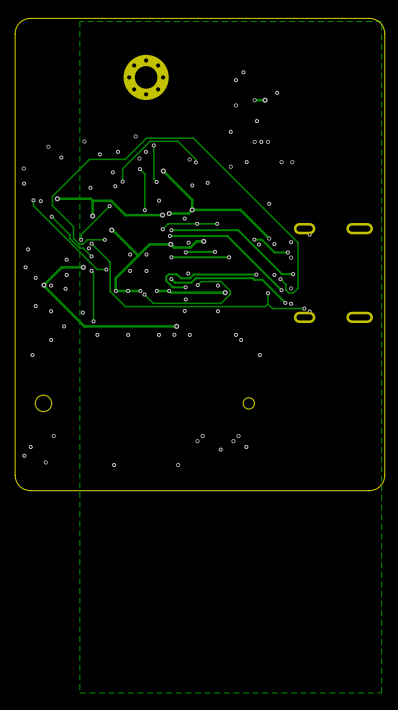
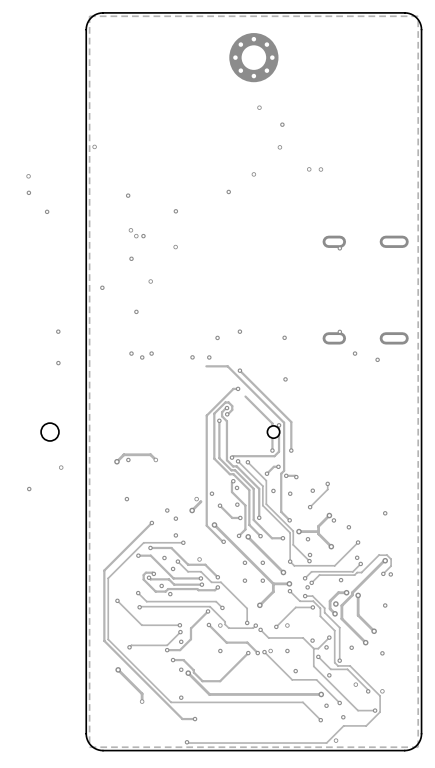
board edge: (92, 18) (28, 18) (19, 22) (15, 31) (15, 475) (17, 482) (22, 488) (30, 490) (369, 490) (380, 486) (384, 475) -> (103, 12) (91, 17) (86, 29) (86, 733) (89, 744) (94, 748) (103, 750) (404, 750) (414, 747) (419, 742) (421, 733) (421, 510)
via: (243, 72) -> none
part position: (146, 77) -> (253, 57)
via: (235, 80) -> none
via: (277, 92) -> none
via: (254, 100) -> none
track: (265, 100) (254, 100) -> none
via: (265, 100) -> none
via: (230, 131) -> none
via: (135, 136) -> none
via: (261, 141) -> none
via: (267, 141) -> none
track: (153, 145) (153, 179) (156, 182) -> none
via: (153, 145) -> none
via: (48, 146) -> none
via: (118, 151) -> none
via: (145, 151) -> none
via: (99, 154) -> none
via: (61, 157) -> none
via: (139, 158) -> none
via: (189, 159) -> none
track: (195, 162) (195, 159) (177, 141) (150, 141) (122, 168) (122, 181) -> none
via: (195, 162) -> none
via: (246, 162) -> none
track: (139, 169) (144, 174) (144, 210) -> none
via: (139, 169) -> none
track: (163, 171) (192, 199) (192, 209) -> none
via: (163, 171) -> none
via: (112, 172) -> none
via: (122, 181) -> none
via: (156, 182) -> none
via: (192, 185) -> none
via: (90, 187) -> none
track: (57, 198) (90, 198) (92, 200) -> none
via: (57, 198) -> none
track: (33, 200) (33, 205) (97, 269) (106, 269) -> none
via: (33, 200) -> none
track: (92, 200) (92, 216) -> none
track: (92, 200) (111, 200) (125, 215) (162, 215) -> none
via: (269, 203) -> none
track: (109, 206) (81, 234) (81, 239) -> none
via: (109, 206) -> none
track: (192, 209) (240, 209) (269, 238) -> none
track: (192, 209) (188, 213) (169, 213) -> none
via: (192, 209) -> none
via: (144, 210) -> none
via: (169, 213) -> none
via: (162, 215) -> none
track: (51, 216) (70, 234) (70, 238) (79, 248) (83, 248) (91, 256) -> none
via: (51, 216) -> none
via: (92, 216) -> none
via: none -> (130, 230)
via: (184, 218) -> none
via: none -> (136, 236)
via: none -> (143, 236)
via: (197, 223) -> none
track: (217, 223) (168, 223) (162, 229) -> none
via: (217, 223) -> none
via: (162, 229) -> none
track: (111, 230) (138, 255) -> none
via: (111, 230) -> none
track: (171, 230) (238, 230) (282, 274) (293, 274) -> none
via: (171, 230) -> none
via: none -> (175, 247)
track: (169, 236) (227, 236) (281, 290) -> none
via: (169, 236) -> none
via: (269, 238) -> none
via: (81, 239) -> none
track: (104, 239) (87, 239) (83, 243) (78, 243) (73, 238) (73, 226) (52, 205) (52, 196) (89, 159) (125, 159) (146, 138) (193, 138) (298, 242) (298, 288) (293, 292) (288, 292) (285, 290) (285, 284) (280, 279) -> none
via: (104, 239) -> none
track: (254, 239) (261, 239) (274, 252) (287, 252) -> none
via: (254, 239) -> none
track: (203, 241) (196, 241) (190, 247) (174, 247) (170, 244) (149, 244) (115, 278) (115, 290) (140, 290) -> none
via: (203, 241) -> none
via: (188, 242) -> none
via: (291, 242) -> none
track: (91, 243) (110, 262) (110, 291) (125, 306) (265, 306) (267, 304) -> none
via: (91, 243) -> none
via: none -> (131, 258)
via: (170, 244) -> none
via: (258, 244) -> none
via: (274, 244) -> none
via: (88, 248) -> none
via: (28, 249) -> none
track: (215, 251) (185, 252) -> none
via: (215, 251) -> none
via: (185, 252) -> none
via: (287, 252) -> none
via: (130, 254) -> none
via: (146, 254) -> none
via: (91, 256) -> none
via: (171, 257) -> none
track: (229, 257) (171, 257) -> none
via: (229, 257) -> none
via: (291, 257) -> none
via: (66, 259) -> none
via: none -> (150, 281)
via: (25, 267) -> none
track: (83, 267) (61, 267) (43, 285) (84, 326) (176, 326) -> none
via: (83, 267) -> none
via: (106, 269) -> none
track: (91, 270) (93, 272) (93, 321) -> none
via: (130, 270) -> none
via: (146, 270) -> none
via: (188, 273) -> none
track: (256, 274) (193, 274) (190, 278) (180, 278) (176, 274) (168, 274) (166, 276) (166, 280) (172, 287) (185, 287) -> none
via: (256, 274) -> none
via: (274, 274) -> none
via: (293, 274) -> none
via: (66, 275) -> none
via: (35, 277) -> none
track: (171, 279) (174, 282) (191, 282) (195, 278) (262, 279) (285, 302) -> none
via: (171, 279) -> none
via: (280, 279) -> none
via: (43, 285) -> none
via: (51, 285) -> none
track: (197, 285) (201, 281) (220, 281) (230, 290) (230, 294) (221, 303) (153, 303) (144, 294) -> none
via: (197, 285) -> none
via: (217, 285) -> none
via: (185, 287) -> none
via: (65, 288) -> none
via: (291, 288) -> none
via: (115, 290) -> none
via: (128, 290) -> none
via: (140, 290) -> none
track: (156, 290) (225, 292) -> none
via: (156, 290) -> none
via: (169, 290) -> none
via: (281, 290) -> none
via: (225, 292) -> none
via: none -> (136, 311)
track: (267, 293) (267, 304) -> none
via: (267, 293) -> none
via: (144, 294) -> none
via: (185, 299) -> none
via: (285, 302) -> none
via: (291, 303) -> none
track: (267, 304) (272, 308) (304, 308) -> none
via: (35, 306) -> none
via: (304, 308) -> none
via: (184, 311) -> none
via: (82, 312) -> none
via: none -> (217, 337)
via: none -> (284, 337)
via: (93, 321) -> none
via: (64, 326) -> none
via: (176, 326) -> none
via: none -> (131, 353)
via: none -> (151, 353)
via: none -> (355, 353)
via: (97, 334) -> none
via: (158, 334) -> none
via: (235, 334) -> none
via: none -> (377, 359)
via: (241, 340) -> none
track: none -> (206, 366) (227, 366) (284, 422) (284, 470) (281, 473) (281, 511) (289, 520)
track: none -> (239, 370) (291, 422) (291, 450)
via: none -> (239, 370)
via: (32, 355) -> none
track: none -> (238, 388) (233, 388) (206, 415) (206, 525) (223, 541)
via: none -> (238, 388)
track: none -> (245, 396) (272, 423) (272, 450)
track: none -> (227, 408) (222, 412) (222, 416) (226, 421) (226, 460) (233, 466) (236, 466) (259, 488) (259, 517)
via: none -> (227, 408)
track: none -> (227, 414) (232, 409) (232, 406) (228, 402) (225, 402) (214, 413) (214, 458) (249, 490) (249, 524) (260, 536)
via: none -> (227, 414)
track: none -> (219, 420) (219, 458) (253, 488) (253, 519) (272, 538) (282, 538)
via: none -> (219, 420)
track: none -> (279, 425) (279, 451) (274, 456) (232, 457)
via: none -> (279, 425)
via: none -> (272, 450)
via: none -> (291, 450)
via: none -> (232, 457)
via: none -> (128, 459)
track: none -> (155, 459) (150, 454) (123, 454) (116, 461)
via: none -> (155, 459)
via: none -> (116, 461)
track: none -> (238, 461) (262, 486) (262, 505) (290, 532) (290, 561) (294, 565) (334, 565) (358, 542)
via: none -> (238, 461)
track: none -> (247, 462) (266, 480) (266, 504) (293, 531) (293, 544) (309, 561)
via: none -> (247, 462)
track: none -> (278, 466) (273, 466) (266, 473)
via: none -> (278, 466)
via: (202, 436) -> none
via: (238, 436) -> none
via: (197, 441) -> none
via: (233, 441) -> none
via: none -> (266, 473)
track: none -> (286, 475) (296, 477)
via: none -> (286, 475)
via: none -> (296, 477)
via: (30, 447) -> none
via: (246, 447) -> none
track: none -> (233, 481) (231, 492) (245, 505) (245, 529) (239, 535)
via: none -> (233, 481)
via: (220, 449) -> none
track: none -> (327, 483) (327, 489) (310, 507)
via: none -> (327, 483)
via: none -> (237, 487)
via: none -> (273, 490)
via: none -> (312, 490)
via: none -> (211, 493)
via: none -> (290, 493)
via: (45, 462) -> none
track: none -> (200, 501) (192, 510)
via: none -> (237, 504)
track: none -> (220, 505) (232, 517) (240, 517)
via: none -> (220, 505)
via: none -> (310, 507)
via: none -> (167, 510)
via: none -> (192, 510)
via: none -> (385, 513)
track: none -> (329, 515) (318, 526) (318, 533) (331, 546)
via: none -> (329, 515)
via: none -> (175, 518)
via: none -> (240, 517)
via: none -> (259, 517)
via: none -> (289, 520)
via: none -> (333, 520)
track: none -> (151, 522) (104, 570) (104, 640) (182, 719) (195, 719)
via: none -> (151, 522)
track: none -> (214, 524) (273, 583)
via: none -> (214, 524)
via: none -> (348, 527)
via: none -> (299, 531)
track: none -> (318, 531) (299, 531)
via: none -> (175, 535)
via: none -> (239, 535)
track: none -> (248, 536) (283, 572)
via: none -> (248, 536)
via: none -> (260, 536)
via: none -> (282, 538)
via: none -> (307, 539)
via: none -> (223, 541)
via: none -> (358, 542)
track: none -> (183, 542) (143, 542) (108, 578) (108, 639) (171, 702) (303, 702) (320, 720)
via: none -> (183, 542)
via: none -> (331, 546)
track: none -> (150, 547) (171, 547) (188, 564) (205, 564) (217, 577)
via: none -> (150, 547)
track: none -> (138, 555) (150, 555) (173, 578) (200, 578)
via: none -> (138, 555)
via: none -> (309, 554)
via: none -> (357, 557)
via: none -> (164, 558)
via: none -> (199, 559)
via: none -> (309, 561)
track: none -> (385, 560) (341, 605) (341, 618) (365, 642)
via: none -> (385, 560)
track: none -> (177, 561) (188, 571) (200, 571) (211, 582) (220, 582) (247, 608) (247, 622)
via: none -> (177, 561)
via: none -> (290, 561)
via: none -> (244, 562)
via: none -> (262, 562)
track: none -> (360, 563) (352, 571) (311, 571) (305, 578)
via: none -> (360, 563)
via: none -> (173, 568)
via: none -> (283, 572)
track: none -> (153, 573) (145, 572) (143, 579) (155, 591) (165, 591) (168, 589) (215, 590) (217, 587)
via: none -> (153, 573)
track: none -> (383, 573) (391, 566) (391, 559) (387, 555) (378, 555) (361, 572) (357, 572) (354, 575) (319, 575) (311, 582)
via: none -> (383, 573)
via: none -> (390, 574)
via: none -> (217, 577)
track: none -> (149, 577) (168, 579) (174, 584) (201, 584)
via: none -> (149, 577)
via: none -> (200, 578)
via: none -> (305, 578)
via: none -> (244, 580)
via: none -> (262, 580)
via: none -> (341, 580)
via: none -> (311, 582)
track: none -> (273, 583) (273, 591) (259, 605)
track: none -> (289, 583) (273, 583)
via: none -> (289, 583)
via: none -> (201, 584)
via: none -> (161, 585)
via: none -> (217, 587)
via: none -> (307, 587)
track: none -> (289, 591) (300, 601) (313, 601) (320, 608) (320, 616) (334, 630) (334, 662) (338, 665) (350, 665) (380, 695) (380, 712) (366, 725) (343, 725) (326, 743) (187, 742)
via: none -> (289, 591)
track: none -> (138, 593) (146, 601) (216, 601) (222, 607)
via: none -> (138, 593)
track: none -> (346, 592) (338, 592) (330, 601) (330, 608) (335, 613)
via: none -> (346, 592)
via: none -> (170, 594)
track: none -> (358, 595) (358, 615) (374, 631)
via: none -> (358, 595)
track: none -> (305, 596) (312, 596) (324, 608) (324, 612) (339, 627) (339, 660)
via: none -> (305, 596)
track: none -> (117, 600) (141, 625) (179, 625)
via: none -> (117, 600)
via: none -> (335, 604)
via: none -> (259, 605)
via: none -> (385, 605)
track: none -> (139, 607) (210, 606) (228, 628) (253, 628) (255, 625)
via: none -> (139, 607)
via: none -> (222, 607)
track: none -> (312, 607) (295, 607) (276, 626)
via: none -> (312, 607)
track: none -> (208, 611) (190, 628) (190, 639) (180, 650) (167, 650)
via: none -> (208, 611)
via: none -> (335, 613)
via: none -> (247, 622)
via: none -> (179, 625)
track: none -> (208, 624) (226, 642) (247, 642) (257, 653)
via: none -> (208, 624)
via: none -> (220, 625)
via: none -> (255, 625)
via: none -> (287, 625)
via: none -> (276, 626)
track: none -> (260, 629) (268, 637) (303, 637) (313, 648)
via: none -> (260, 629)
via: none -> (374, 631)
track: none -> (180, 632) (167, 645) (131, 645) (129, 647)
via: none -> (180, 632)
track: none -> (329, 637) (318, 648) (313, 648)
via: none -> (329, 637)
via: none -> (312, 640)
via: none -> (181, 641)
via: none -> (365, 642)
via: none -> (129, 647)
via: none -> (326, 647)
via: none -> (351, 647)
track: none -> (313, 648) (313, 666) (358, 710) (375, 710)
via: none -> (167, 650)
via: none -> (220, 650)
via: none -> (270, 650)
via: none -> (287, 650)
track: none -> (264, 652) (292, 679) (316, 679) (339, 702)
via: none -> (264, 652)
track: none -> (248, 653) (220, 681) (202, 681) (183, 660) (173, 660)
via: none -> (248, 653)
via: none -> (257, 653)
via: none -> (382, 653)
track: none -> (318, 656) (330, 669) (347, 669) (368, 691)
via: none -> (318, 656)
via: none -> (173, 660)
via: none -> (339, 660)
track: none -> (118, 669) (142, 693) (142, 701)
via: none -> (118, 669)
via: none -> (181, 669)
via: none -> (295, 671)
track: none -> (188, 673) (209, 694) (321, 694)
via: none -> (188, 673)
via: none -> (329, 675)
via: none -> (355, 684)
via: none -> (368, 691)
via: none -> (382, 691)
via: none -> (321, 694)
via: none -> (181, 697)
via: none -> (142, 701)
via: none -> (339, 702)
via: none -> (326, 705)
via: none -> (375, 710)
via: none -> (343, 717)
via: none -> (195, 719)
via: none -> (320, 720)
via: none -> (336, 740)
via: none -> (187, 742)

